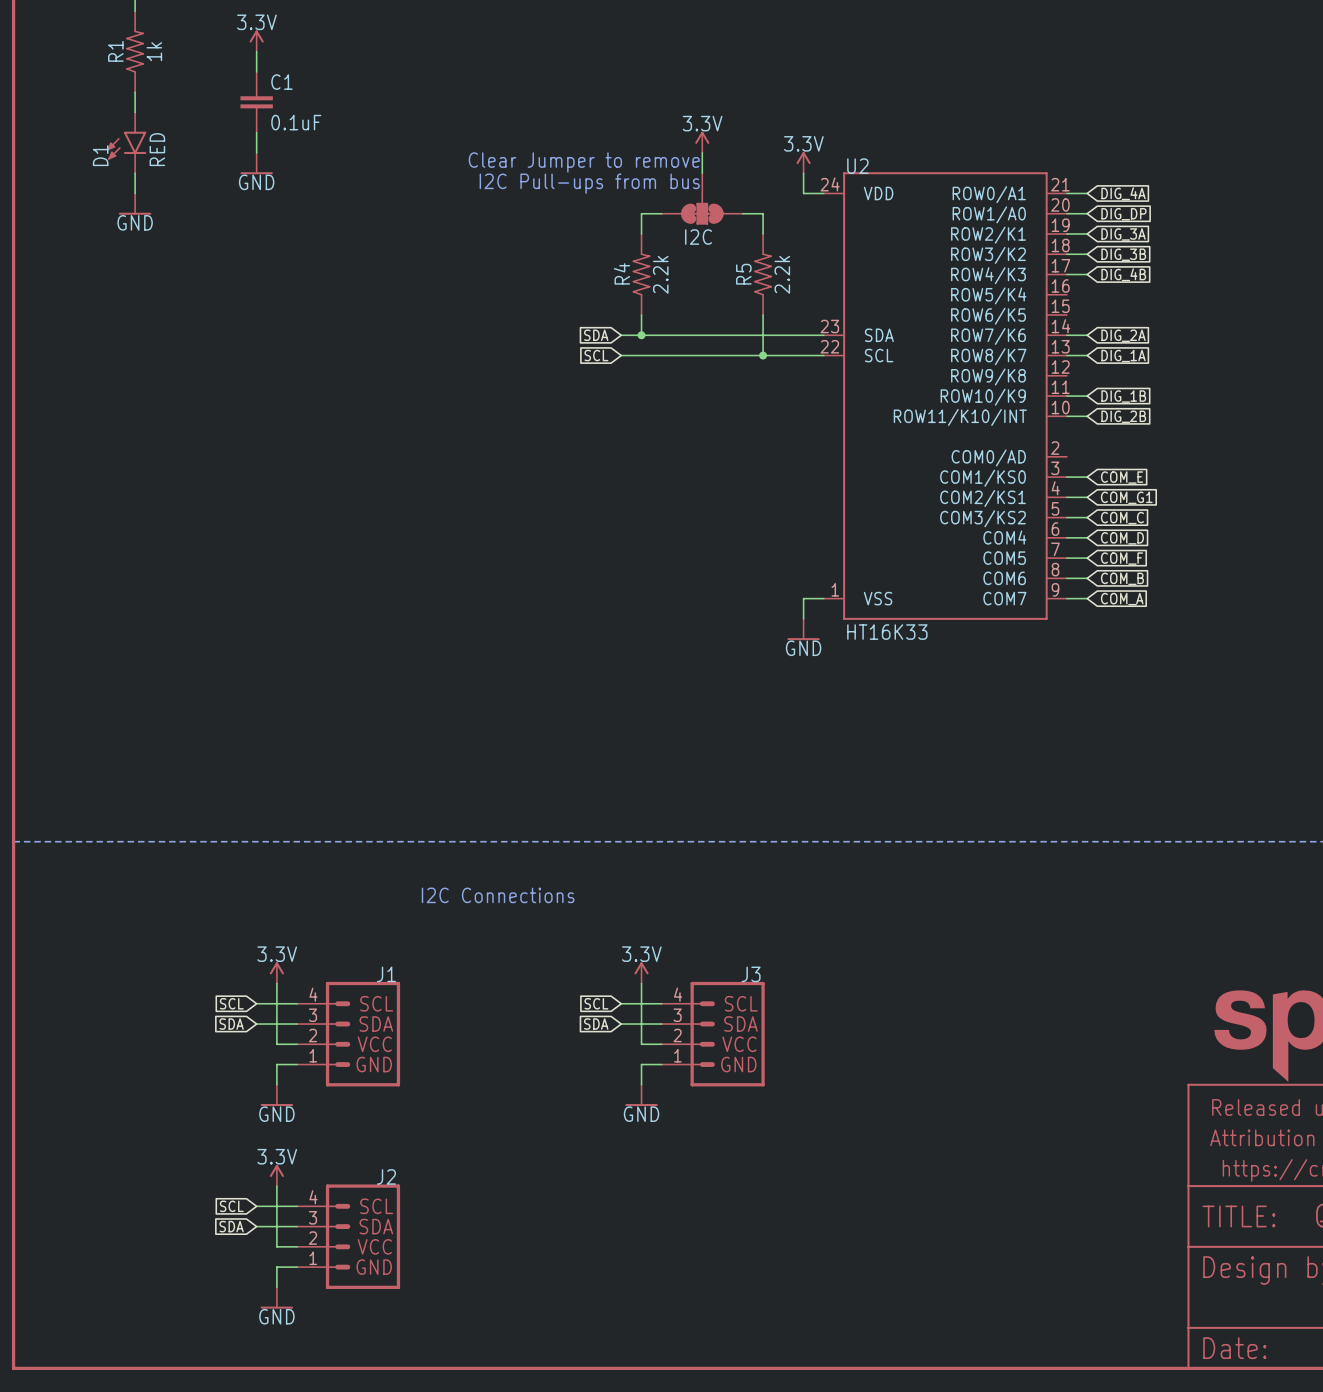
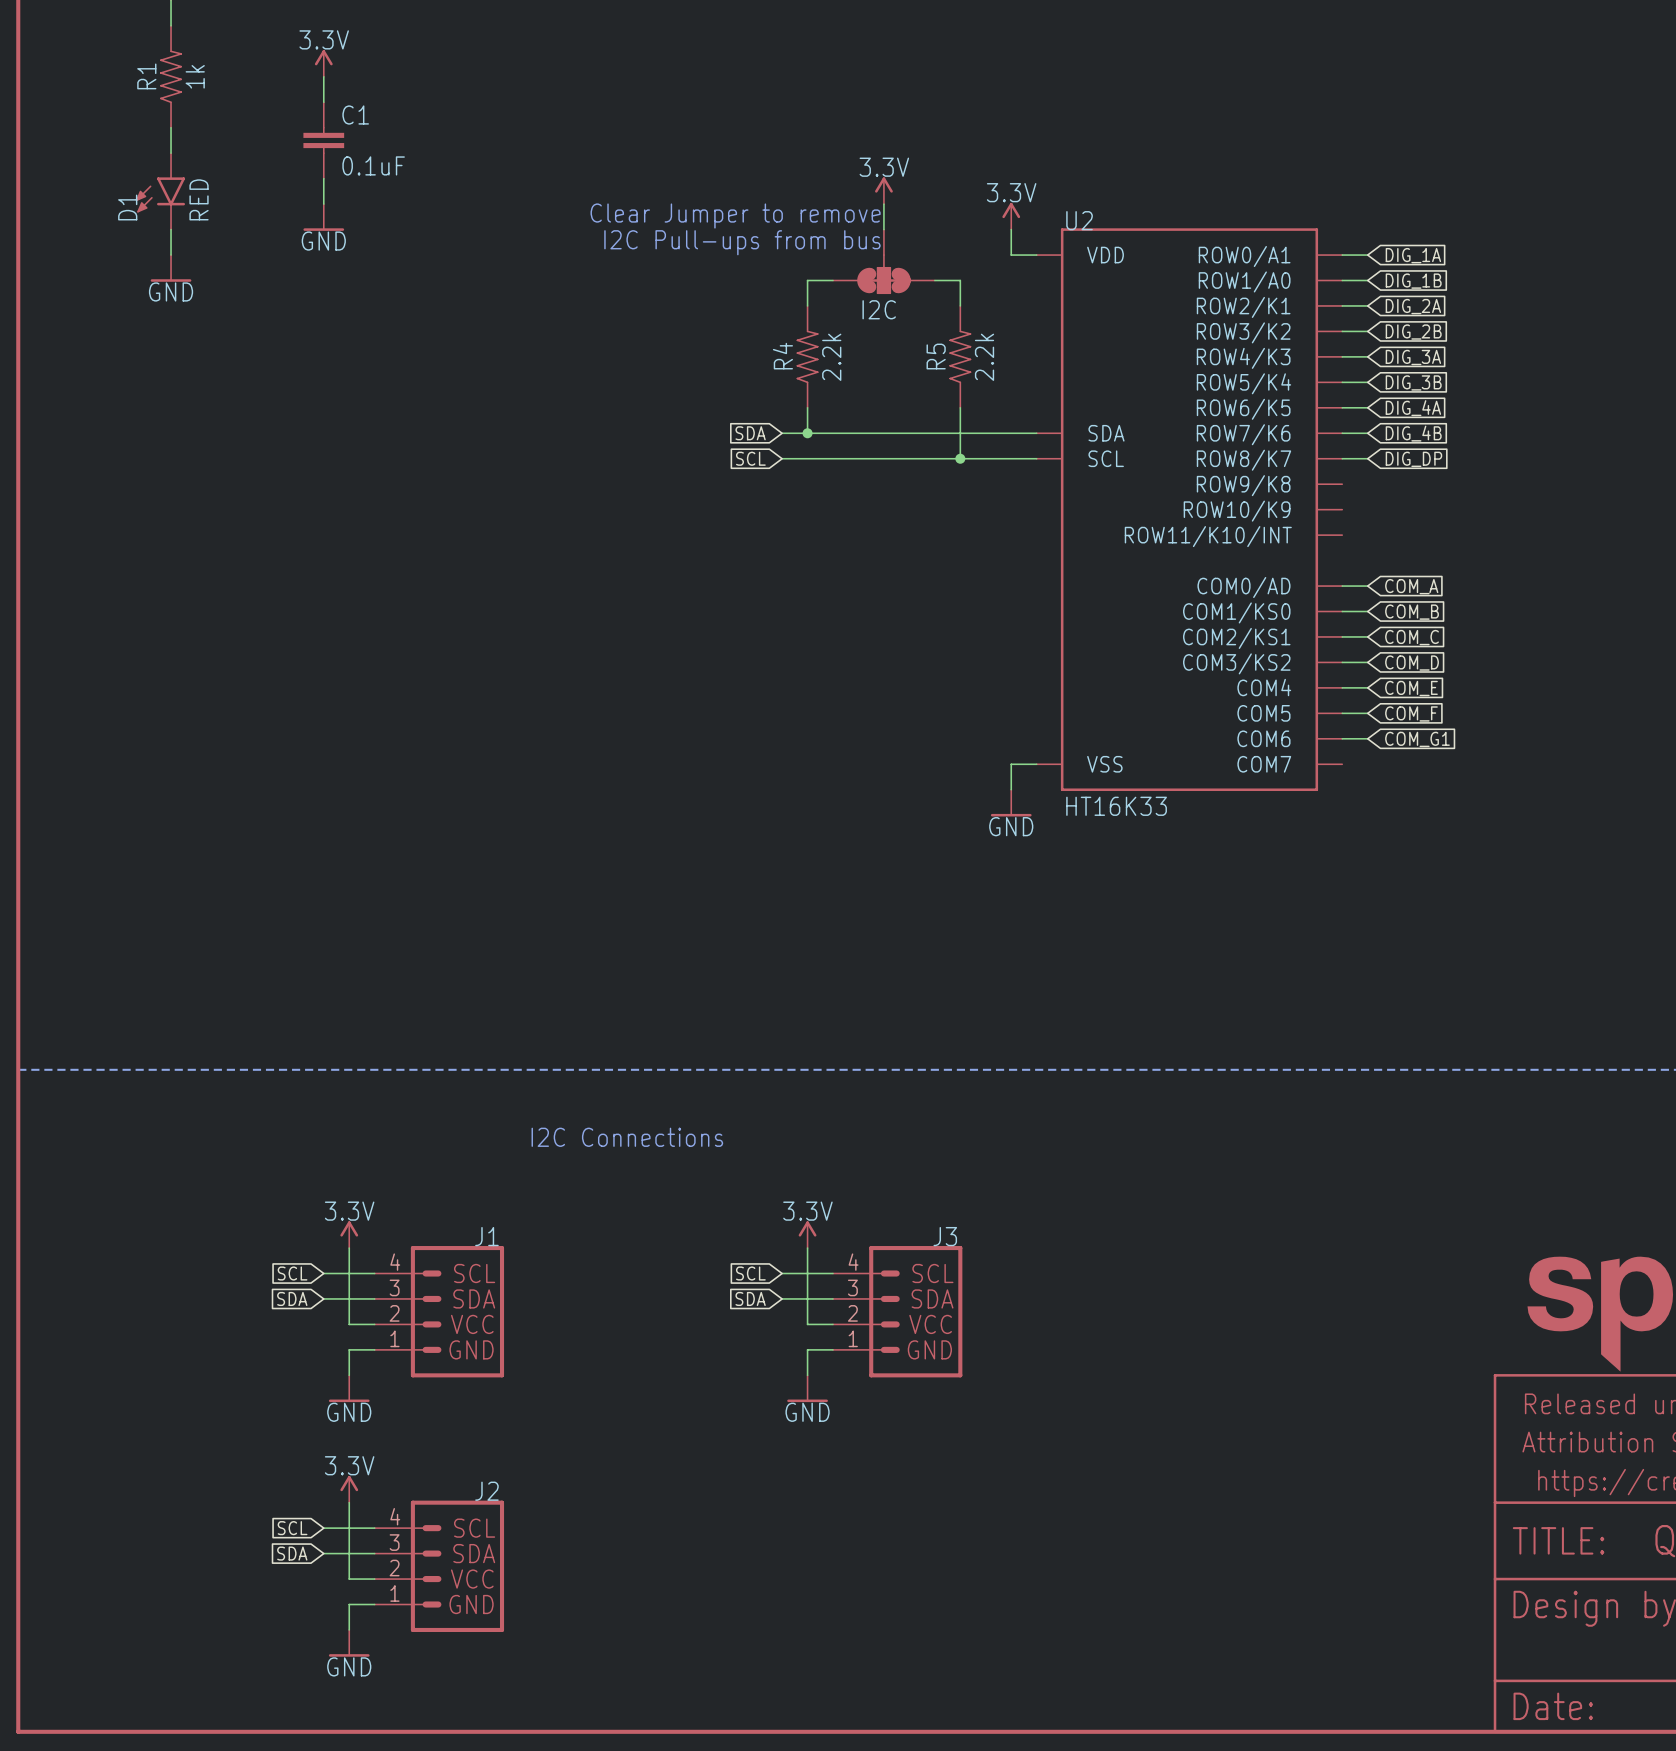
U2 symbol: [823, 172, 1067, 620] -> [1036, 228, 1343, 792]
global label: DIG_4A (1123, 193) -> DIG_1A (1413, 255)
global label: DIG_DP (1123, 214) -> DIG_1B (1413, 281)
global label: DIG_3A (1123, 234) -> DIG_2A (1413, 306)
global label: DIG_3B (1123, 254) -> DIG_2B (1413, 332)
global label: DIG_4B (1123, 274) -> DIG_3A (1413, 357)
global label: none -> DIG_3B (1413, 382)
global label: none -> DIG_4A (1413, 408)
global label: DIG_2A (1123, 335) -> DIG_4B (1413, 433)
global label: DIG_1A (1123, 356) -> DIG_DP (1413, 459)
wire: (1066, 396) (1087, 396) -> (1342, 382) (1367, 382)
global label: DIG_1B (1123, 396) -> none
wire: (1066, 416) (1087, 416) -> (1342, 407) (1367, 407)
global label: DIG_2B (1123, 416) -> none
global label: COM_E (1122, 477) -> COM_B (1412, 612)
global label: COM_G1 (1126, 497) -> COM_C (1412, 637)
global label: COM_C (1122, 518) -> COM_D (1412, 663)
global label: COM_D (1122, 538) -> COM_E (1411, 688)
global label: COM_B (1122, 578) -> COM_G1 (1417, 739)
wire: (1066, 598) (1087, 598) -> (1342, 586) (1367, 586)
global label position: COM_A (1122, 599) -> COM_A (1411, 586)

